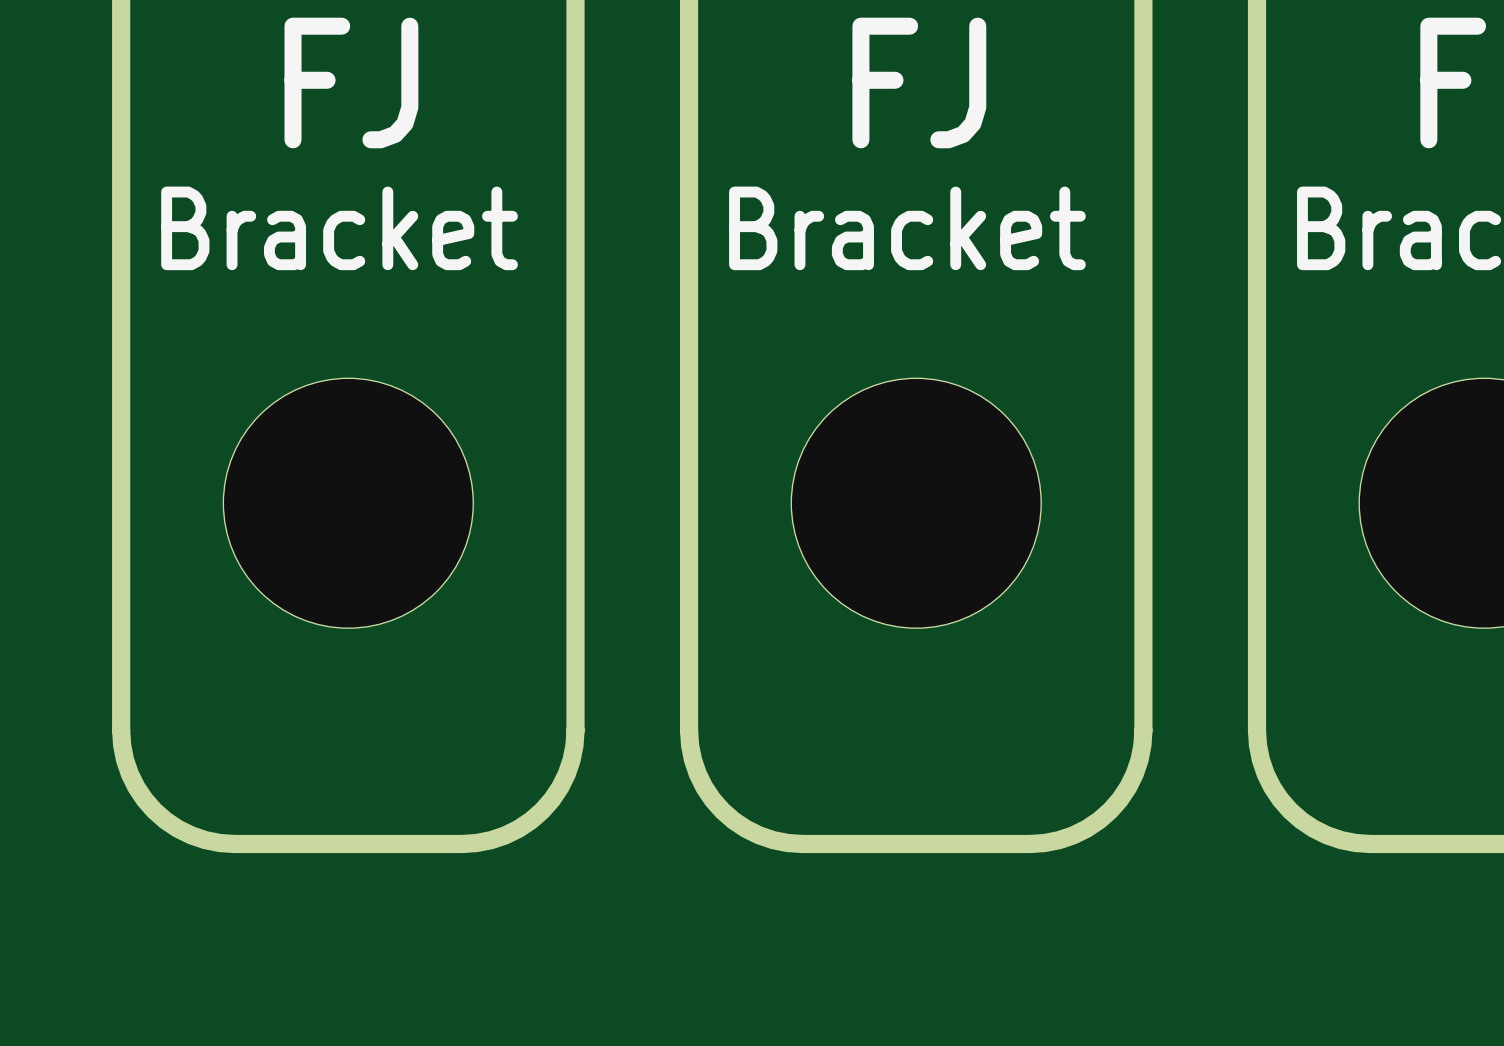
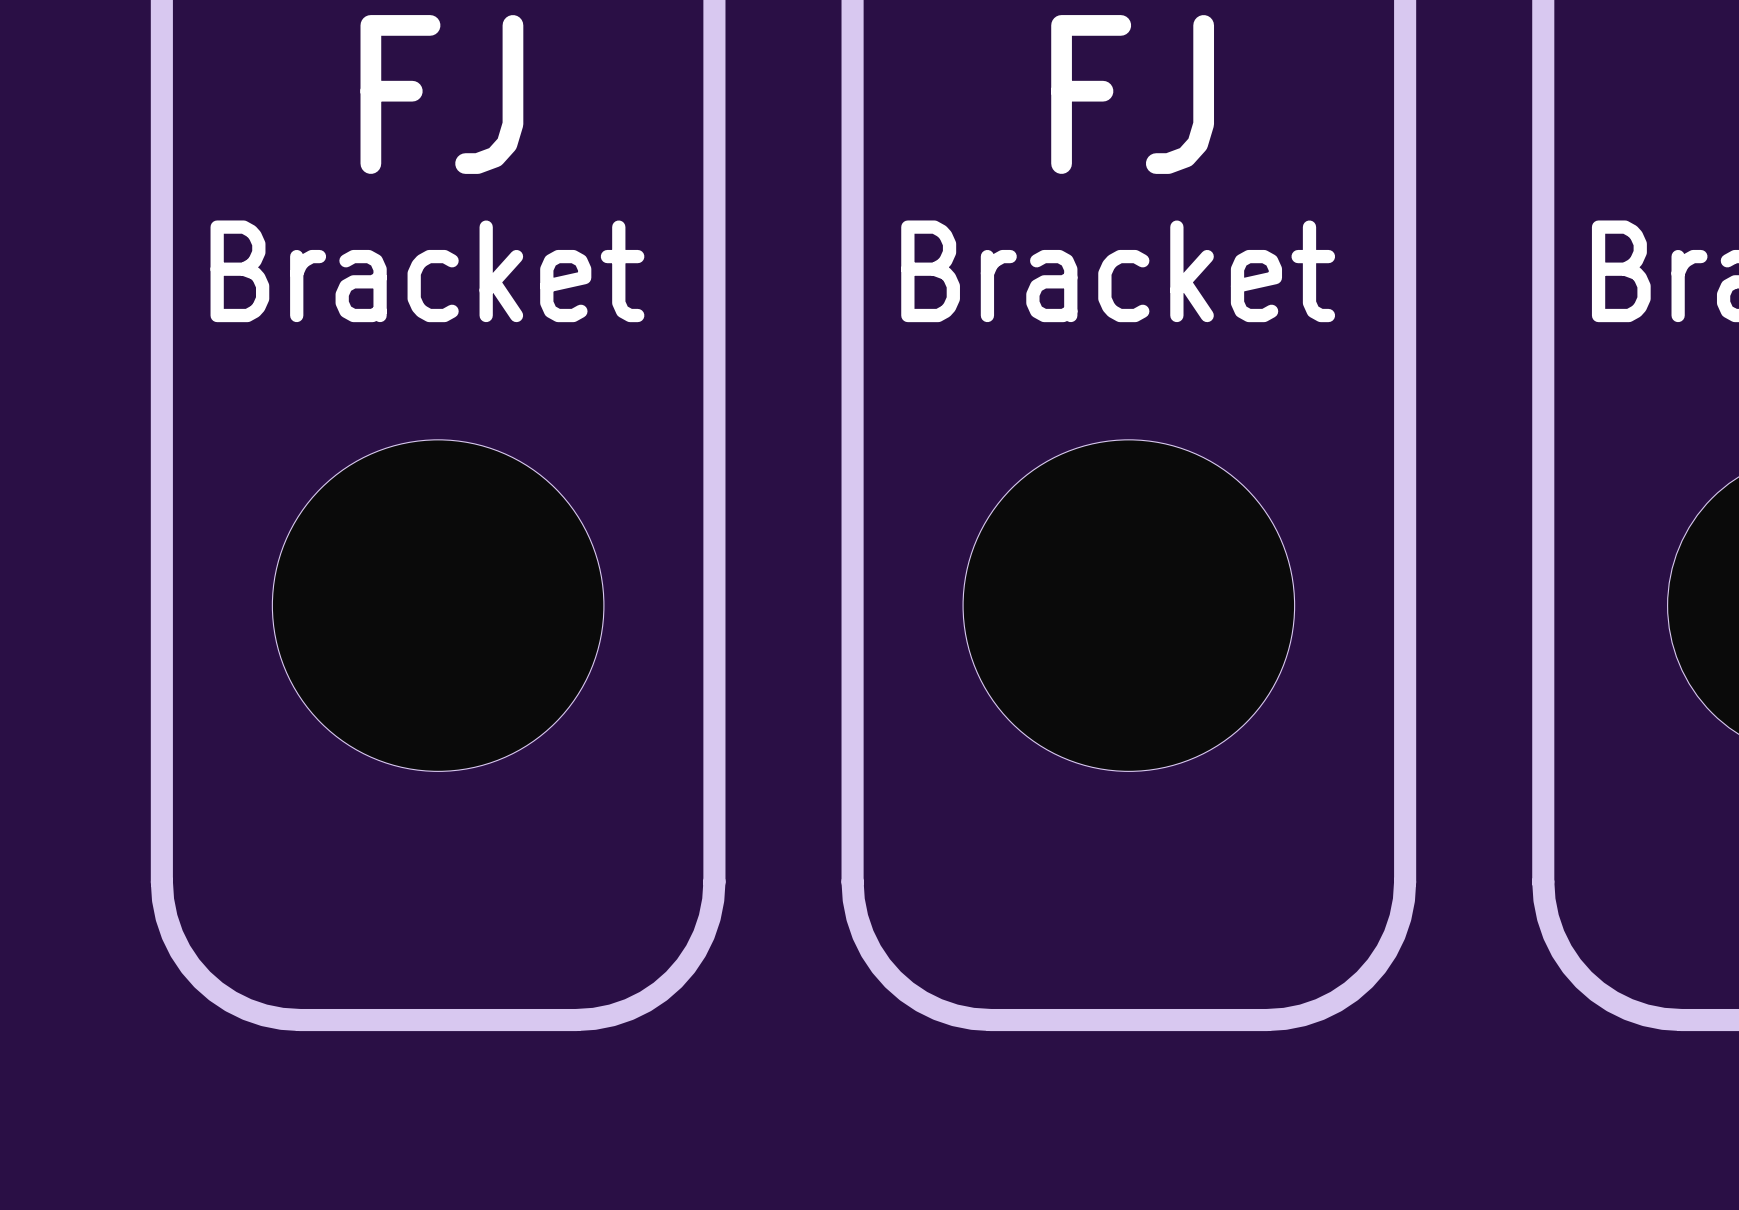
hole size: [223, 378, 474, 629] -> [272, 439, 604, 772]
hole size: [791, 378, 1042, 629] -> [963, 439, 1295, 772]

